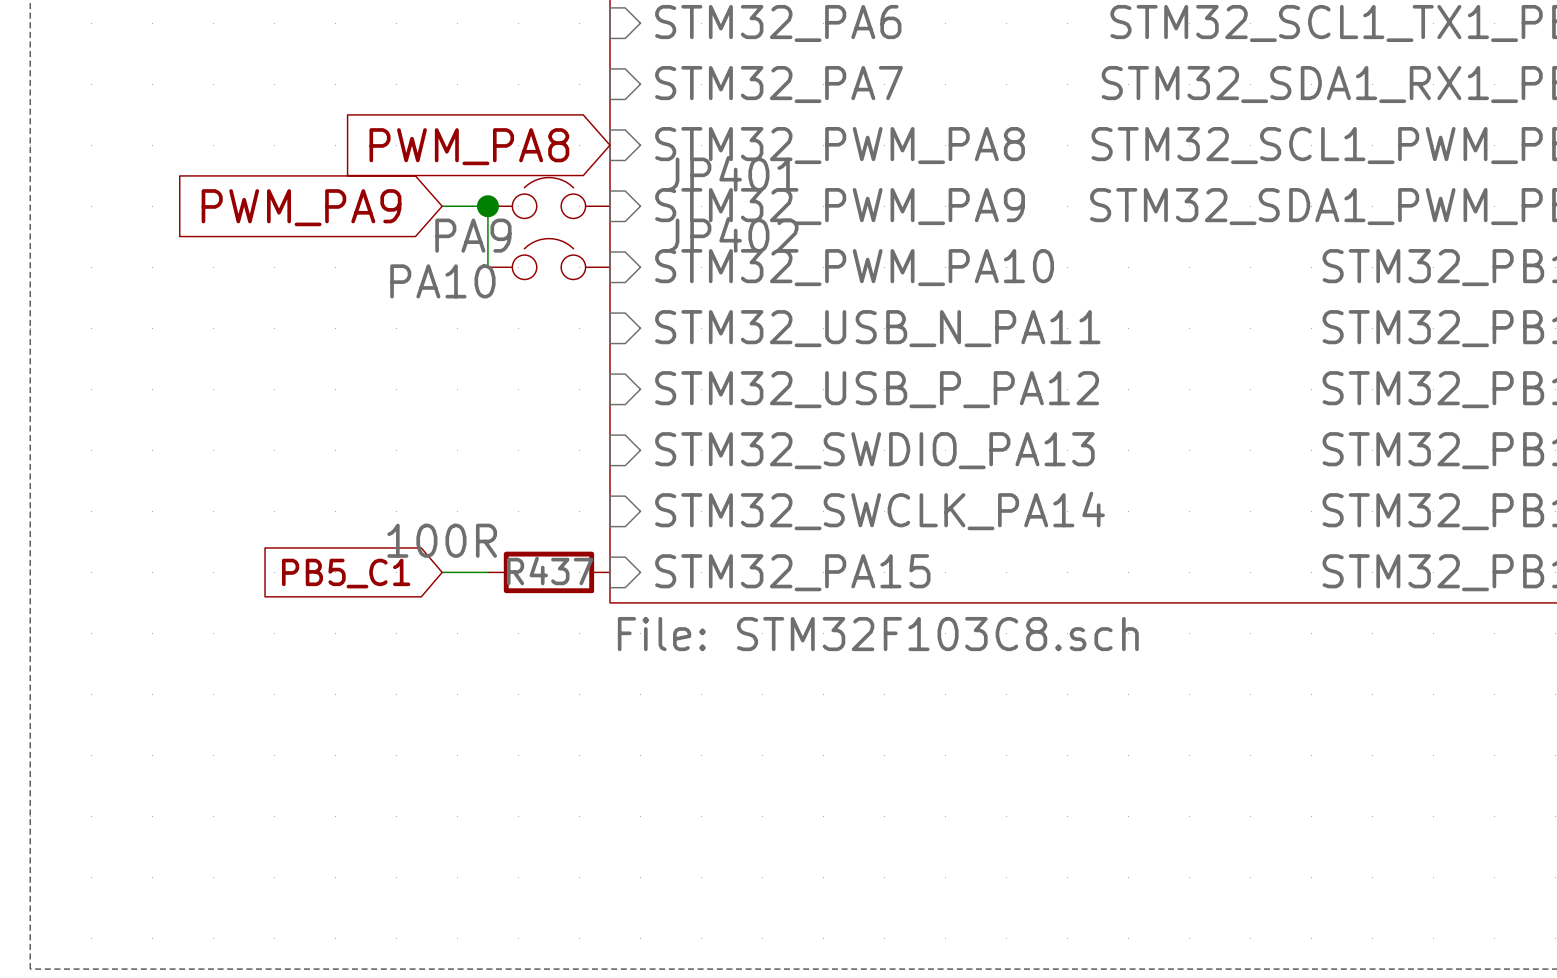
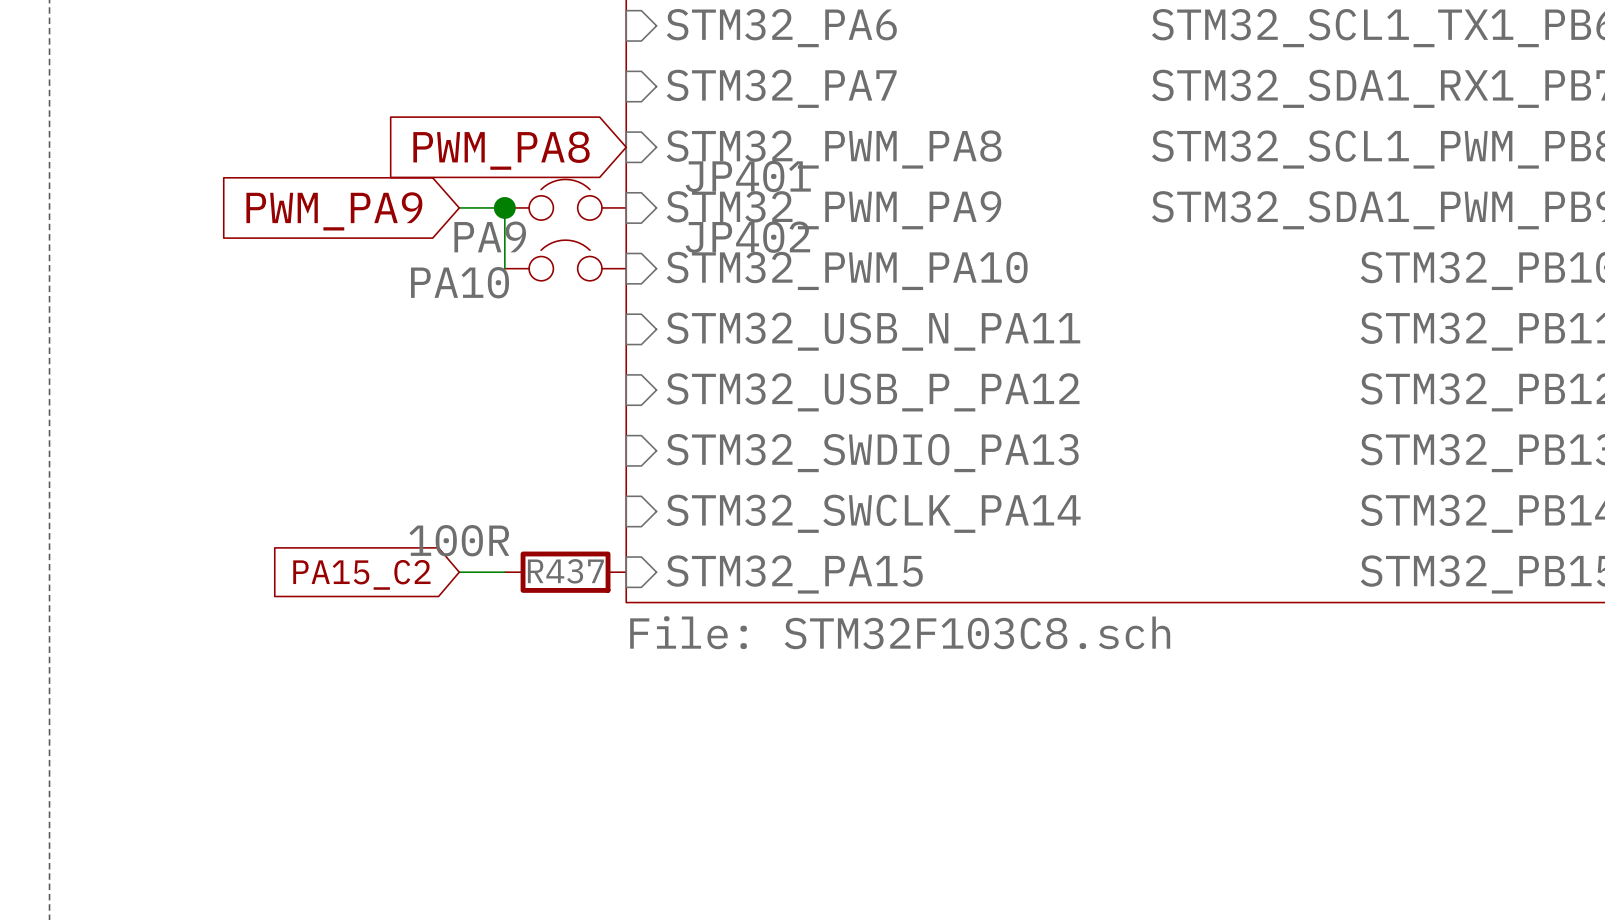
global label: PB5_C1 (346, 573) -> PA15_C2 (361, 574)

